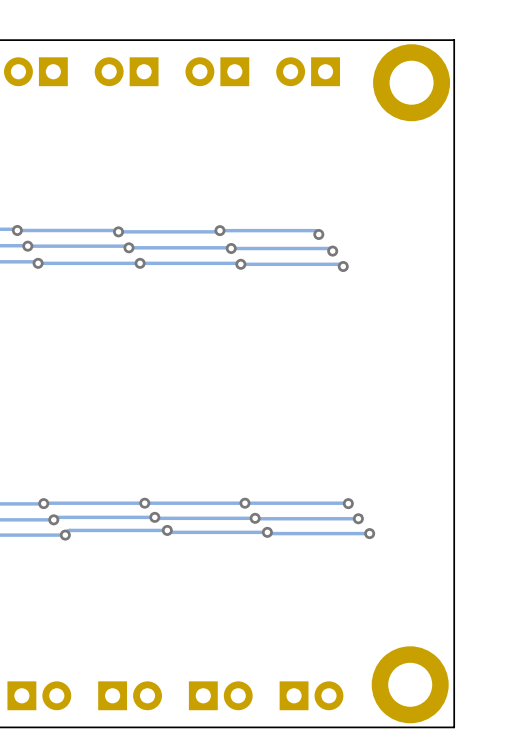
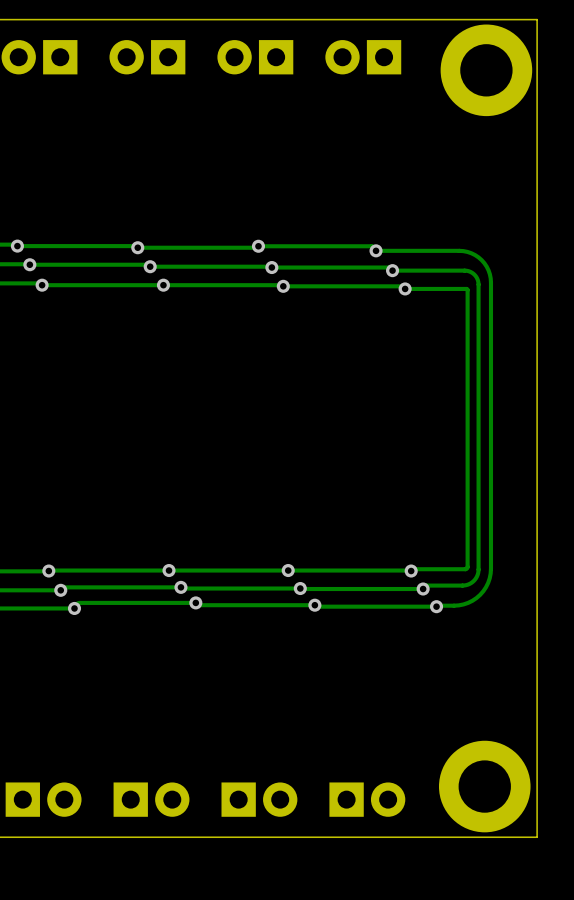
track: none -> (376, 250) (467, 251) (478, 257) (484, 263) (490, 278) (490, 573) (483, 591) (472, 600) (458, 605) (437, 605)
track: none -> (392, 270) (466, 270) (474, 274) (478, 282) (478, 573) (473, 580) (466, 585) (426, 585)
track: none -> (405, 288) (467, 290) (467, 567) (465, 569) (412, 569)

